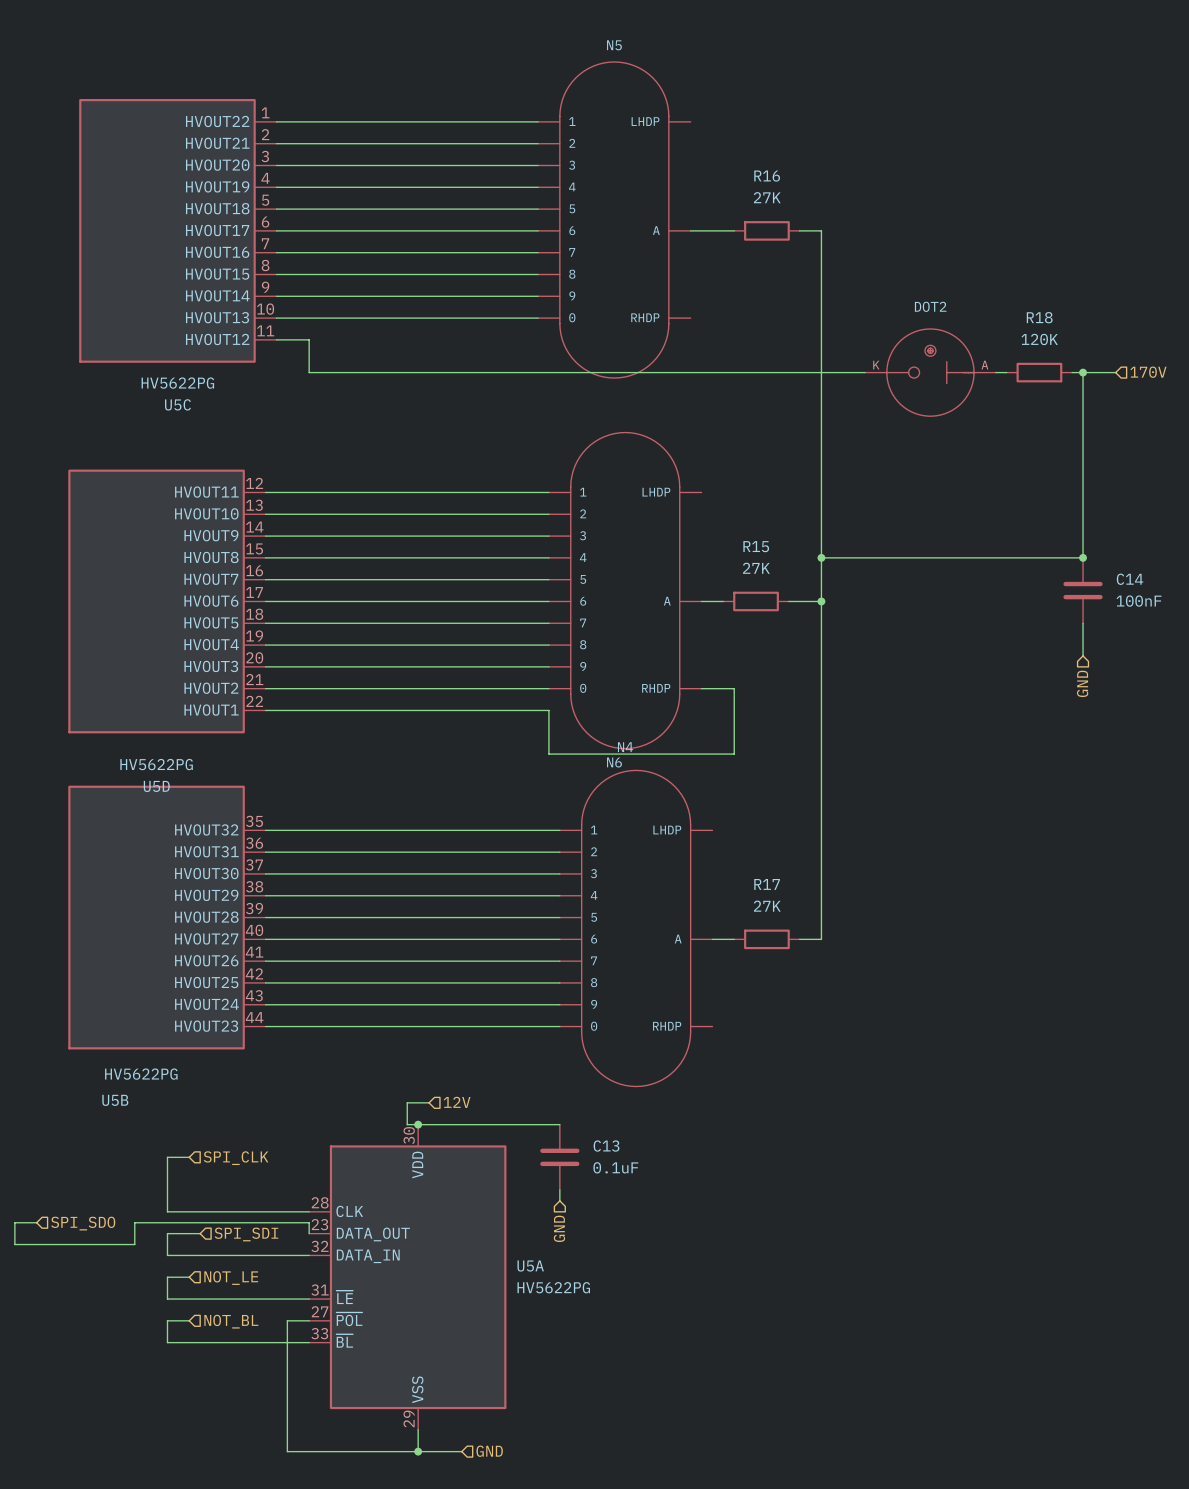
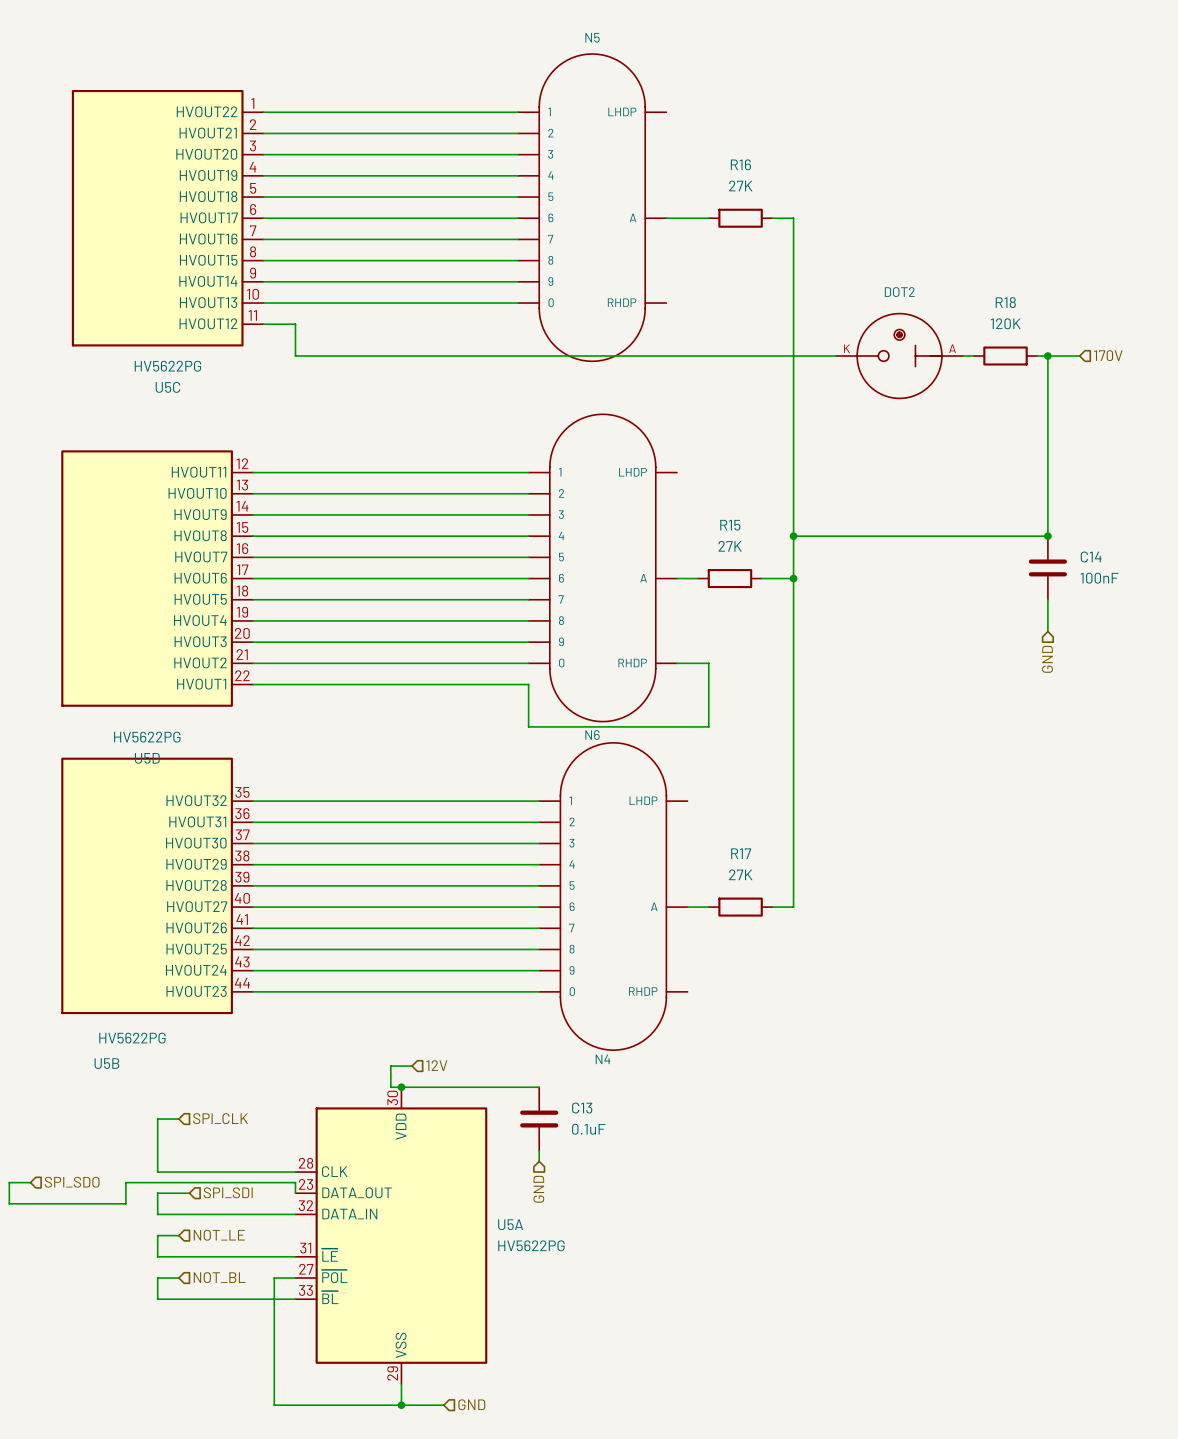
N4 name position: N4 (625, 747) -> N4 (603, 1059)

